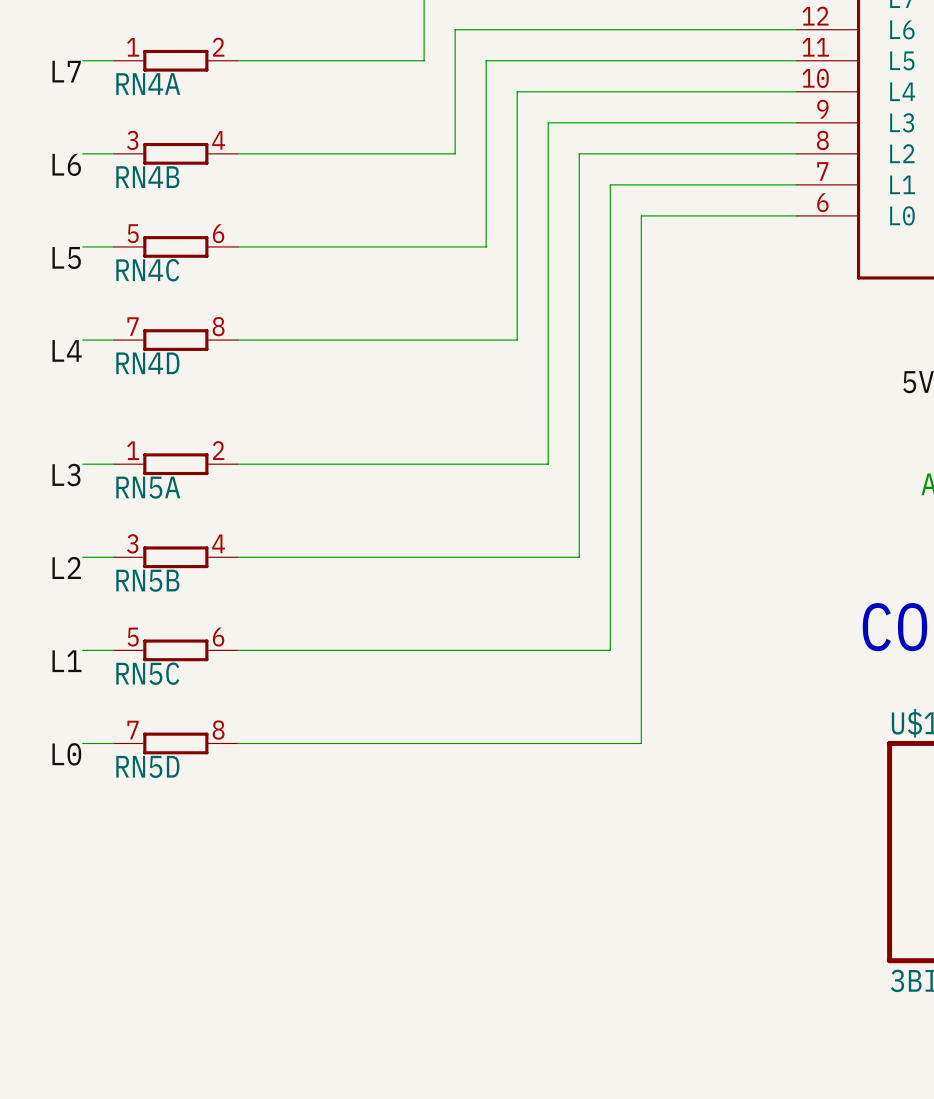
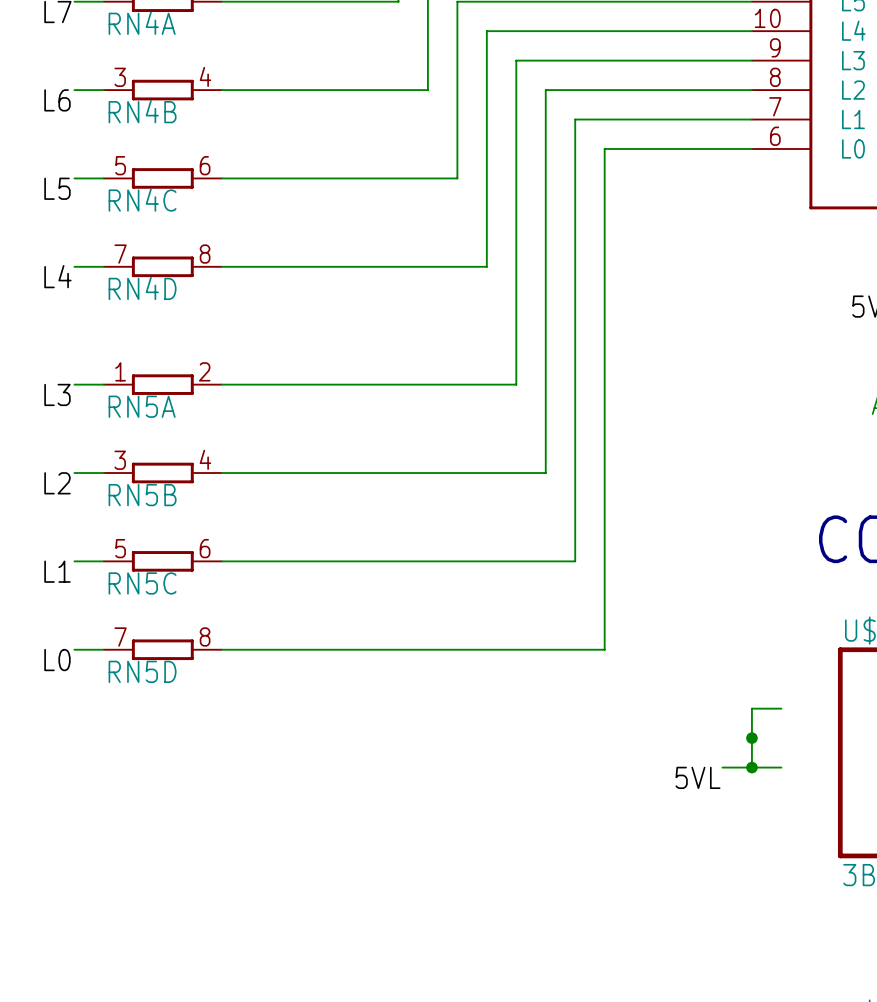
wire: none -> (781, 708) (751, 708) (751, 767)
junction: none -> (751, 738)
wire: none -> (722, 767) (781, 767)
junction: none -> (751, 767)
label: none -> 5VL (697, 777)

